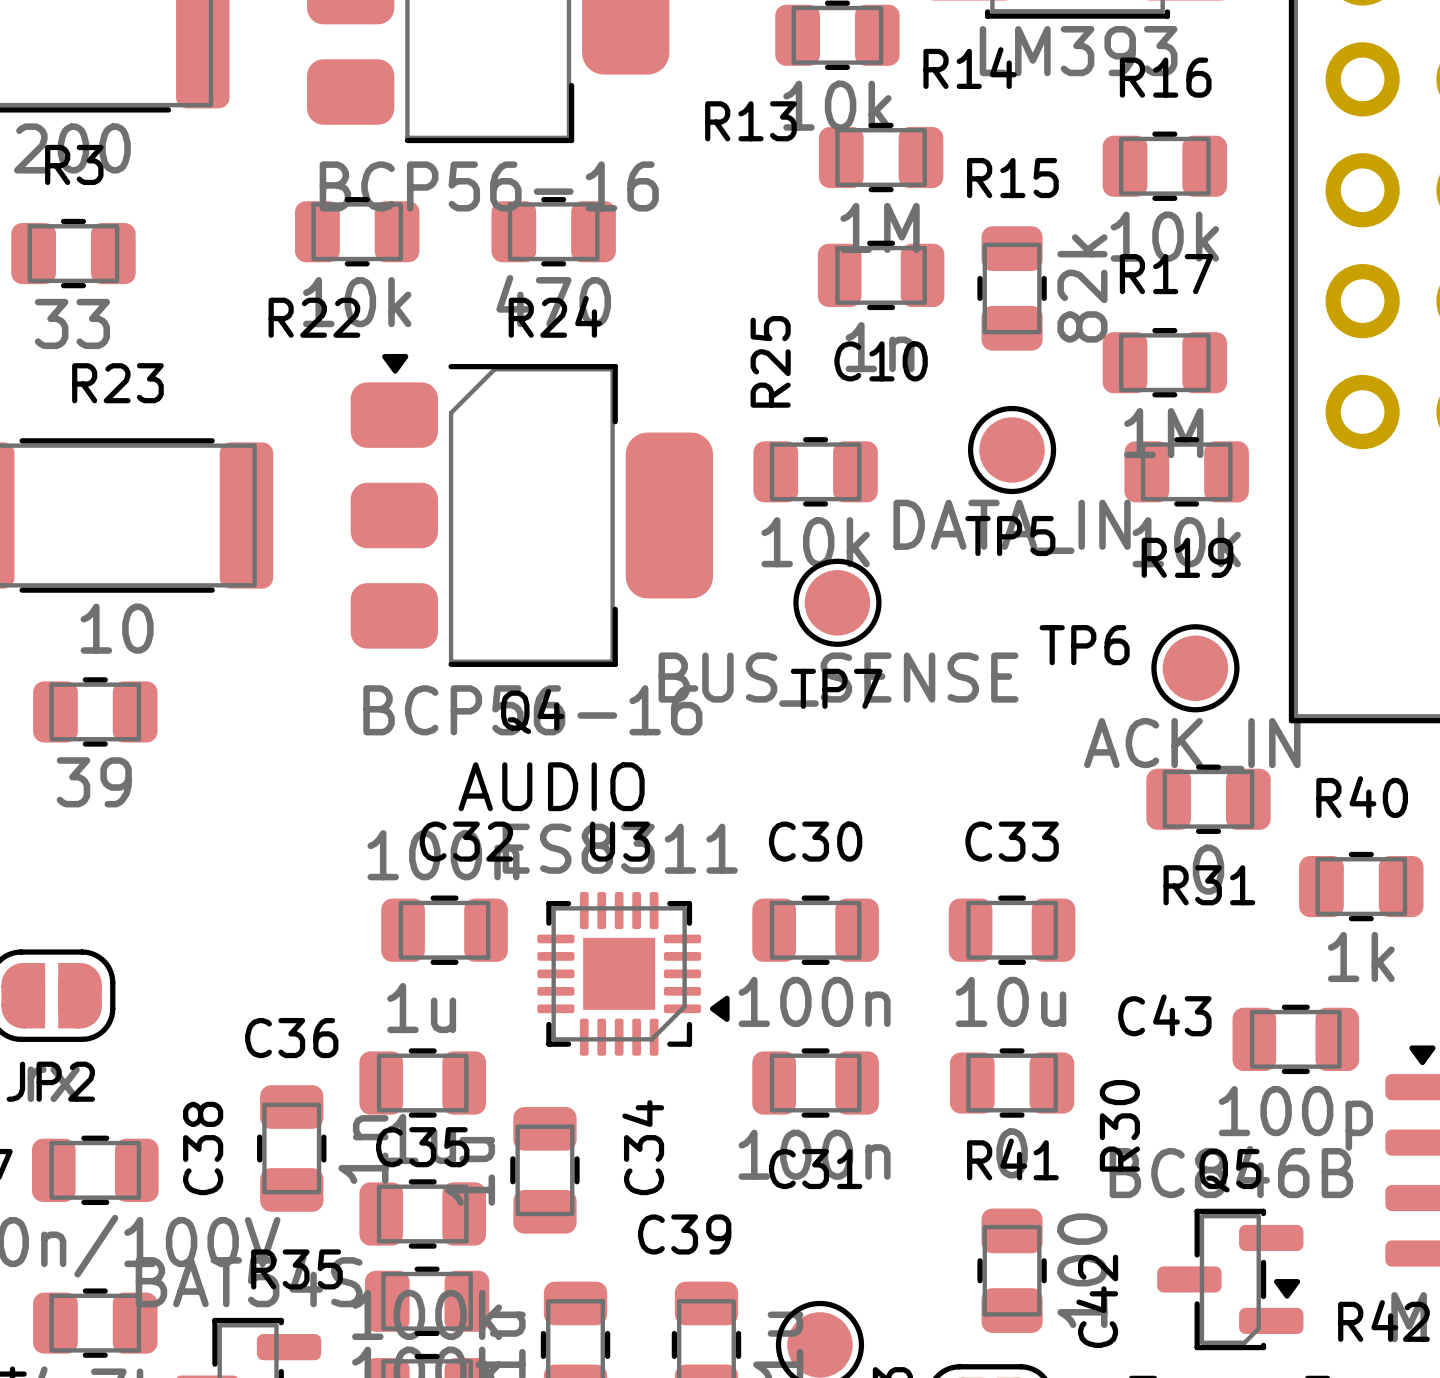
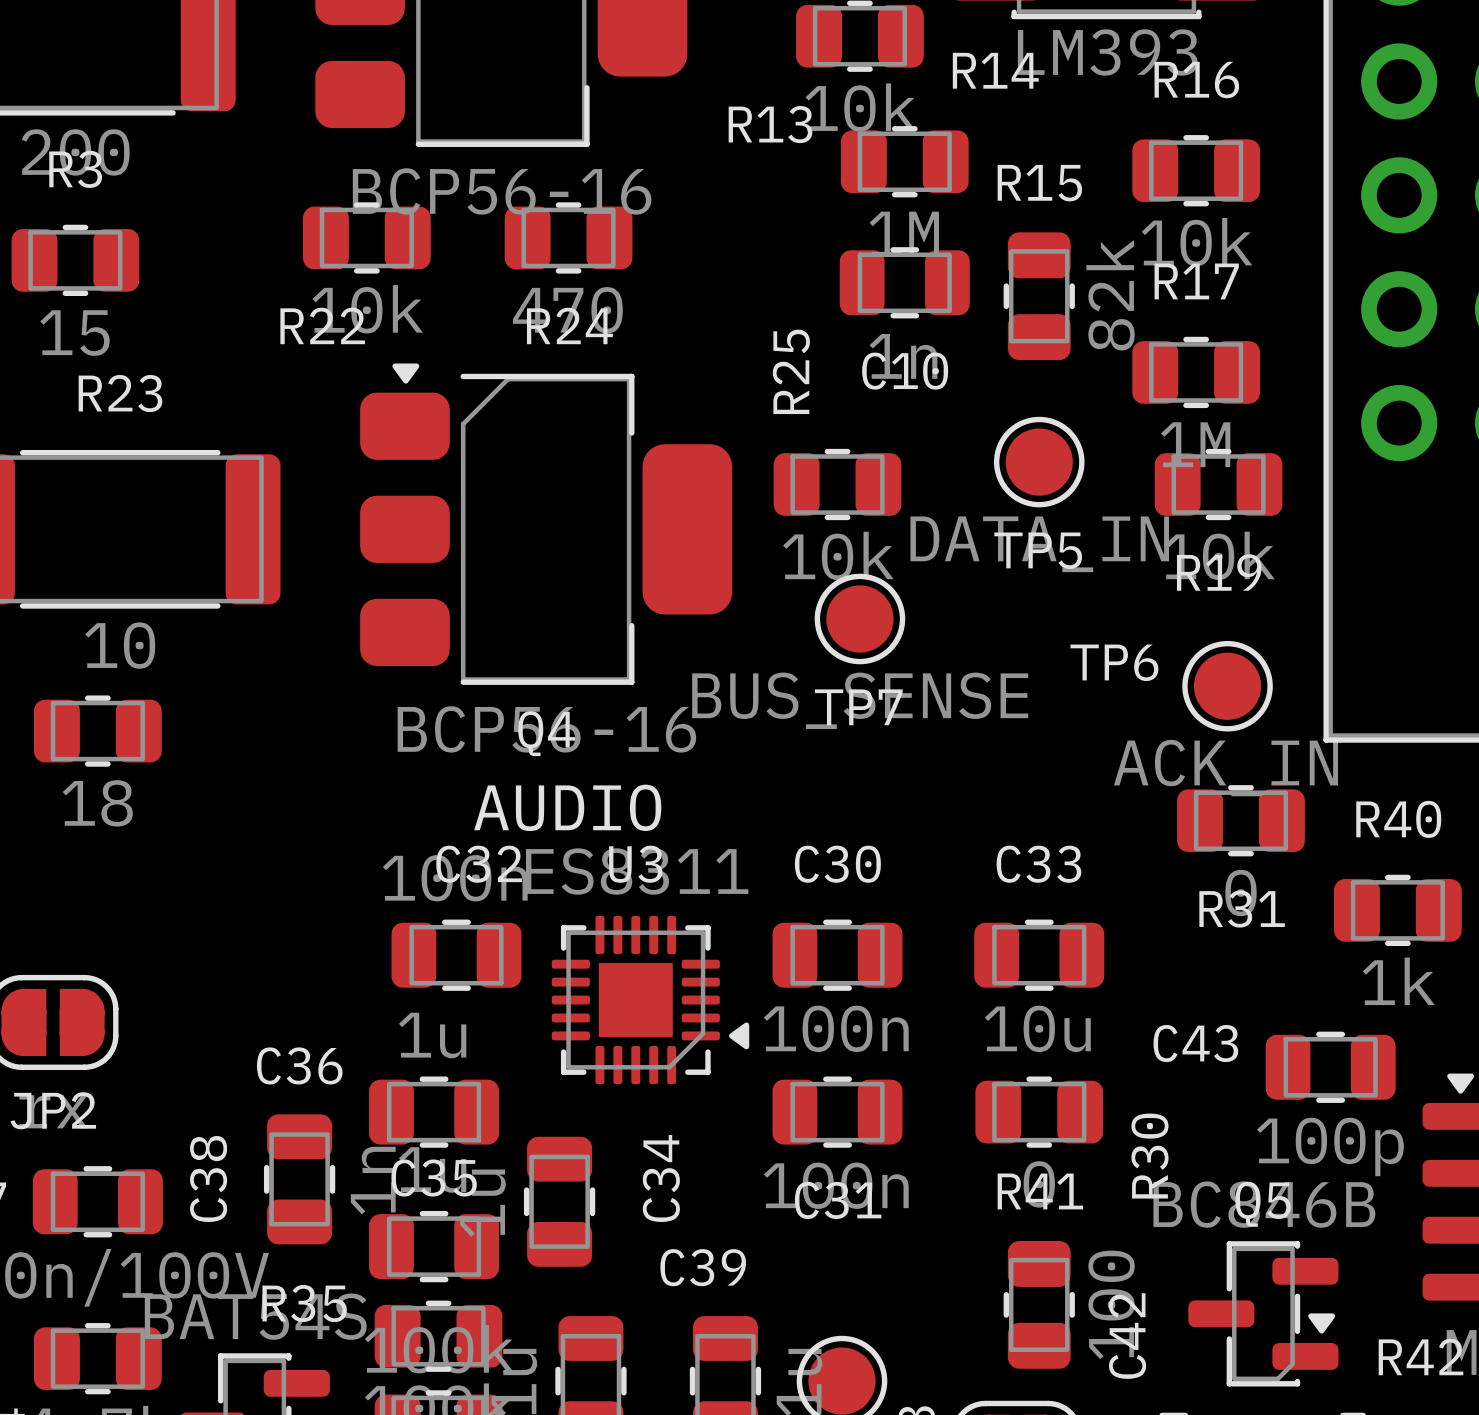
R3 value: 33 (72, 323) -> 15 (74, 333)
part value: 39 (94, 782) -> 18 (97, 803)

